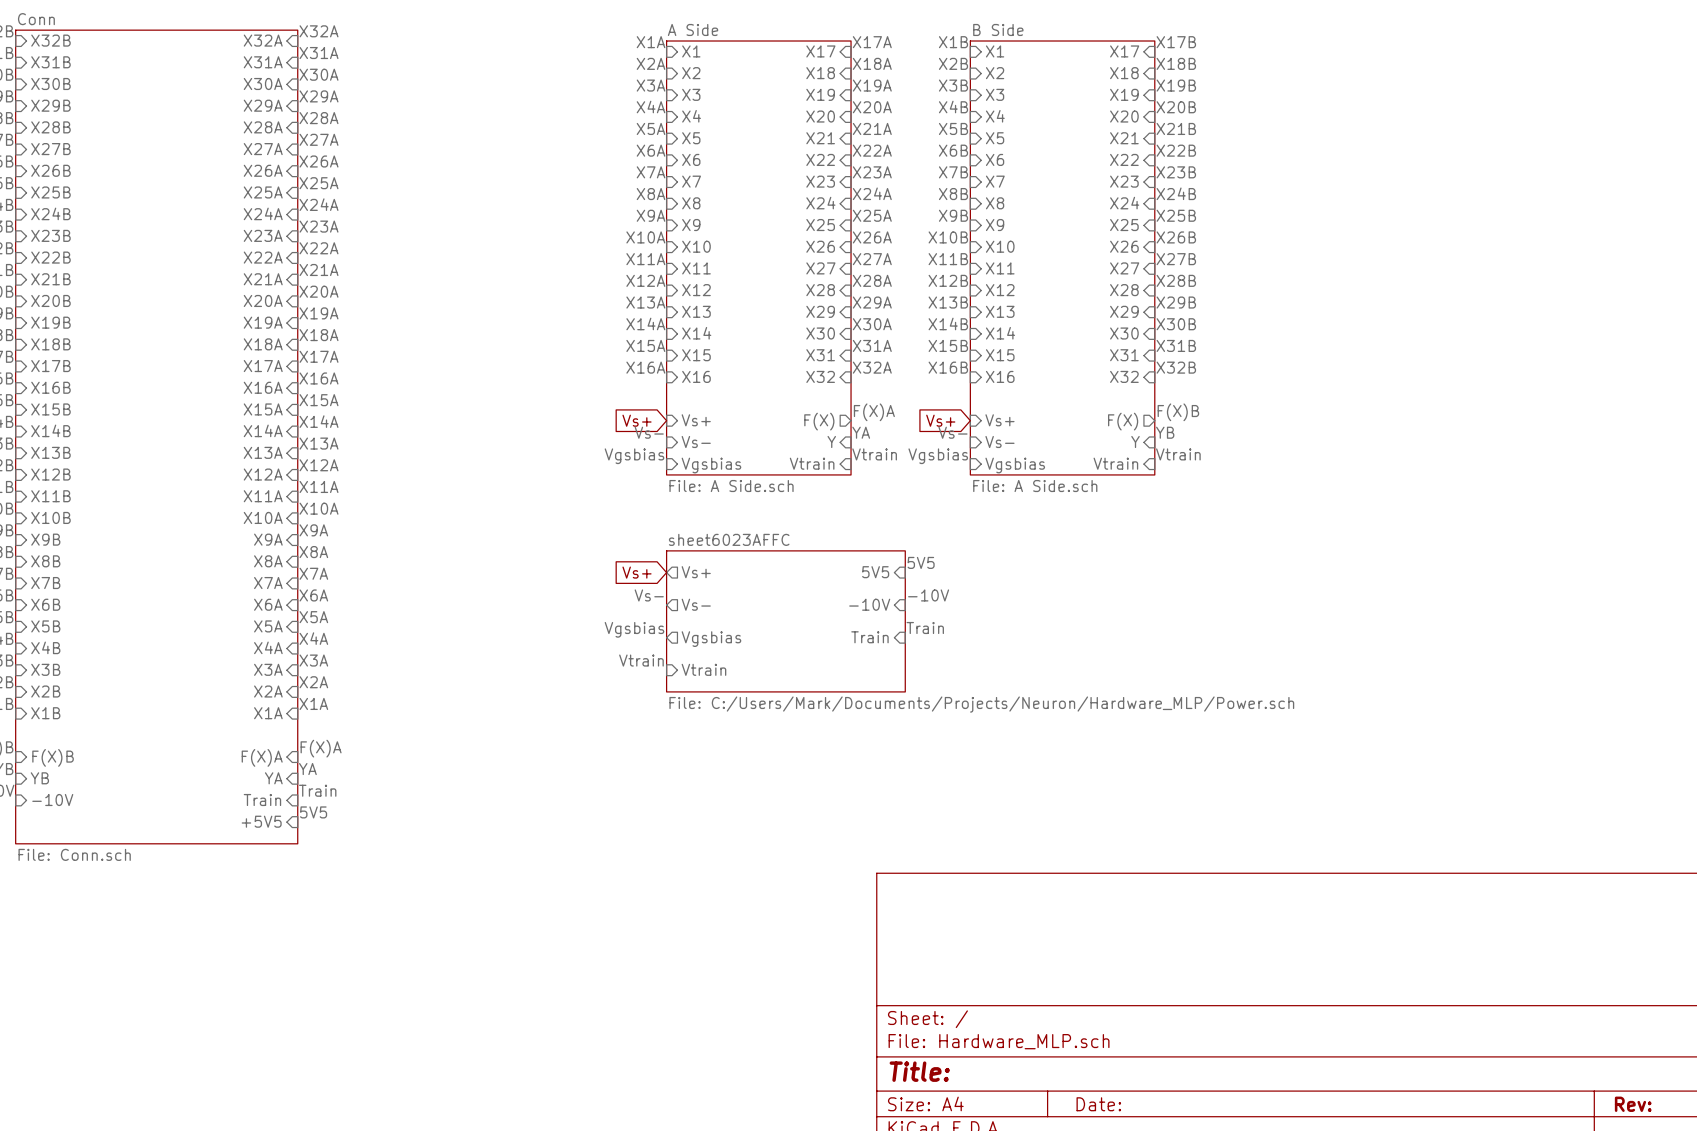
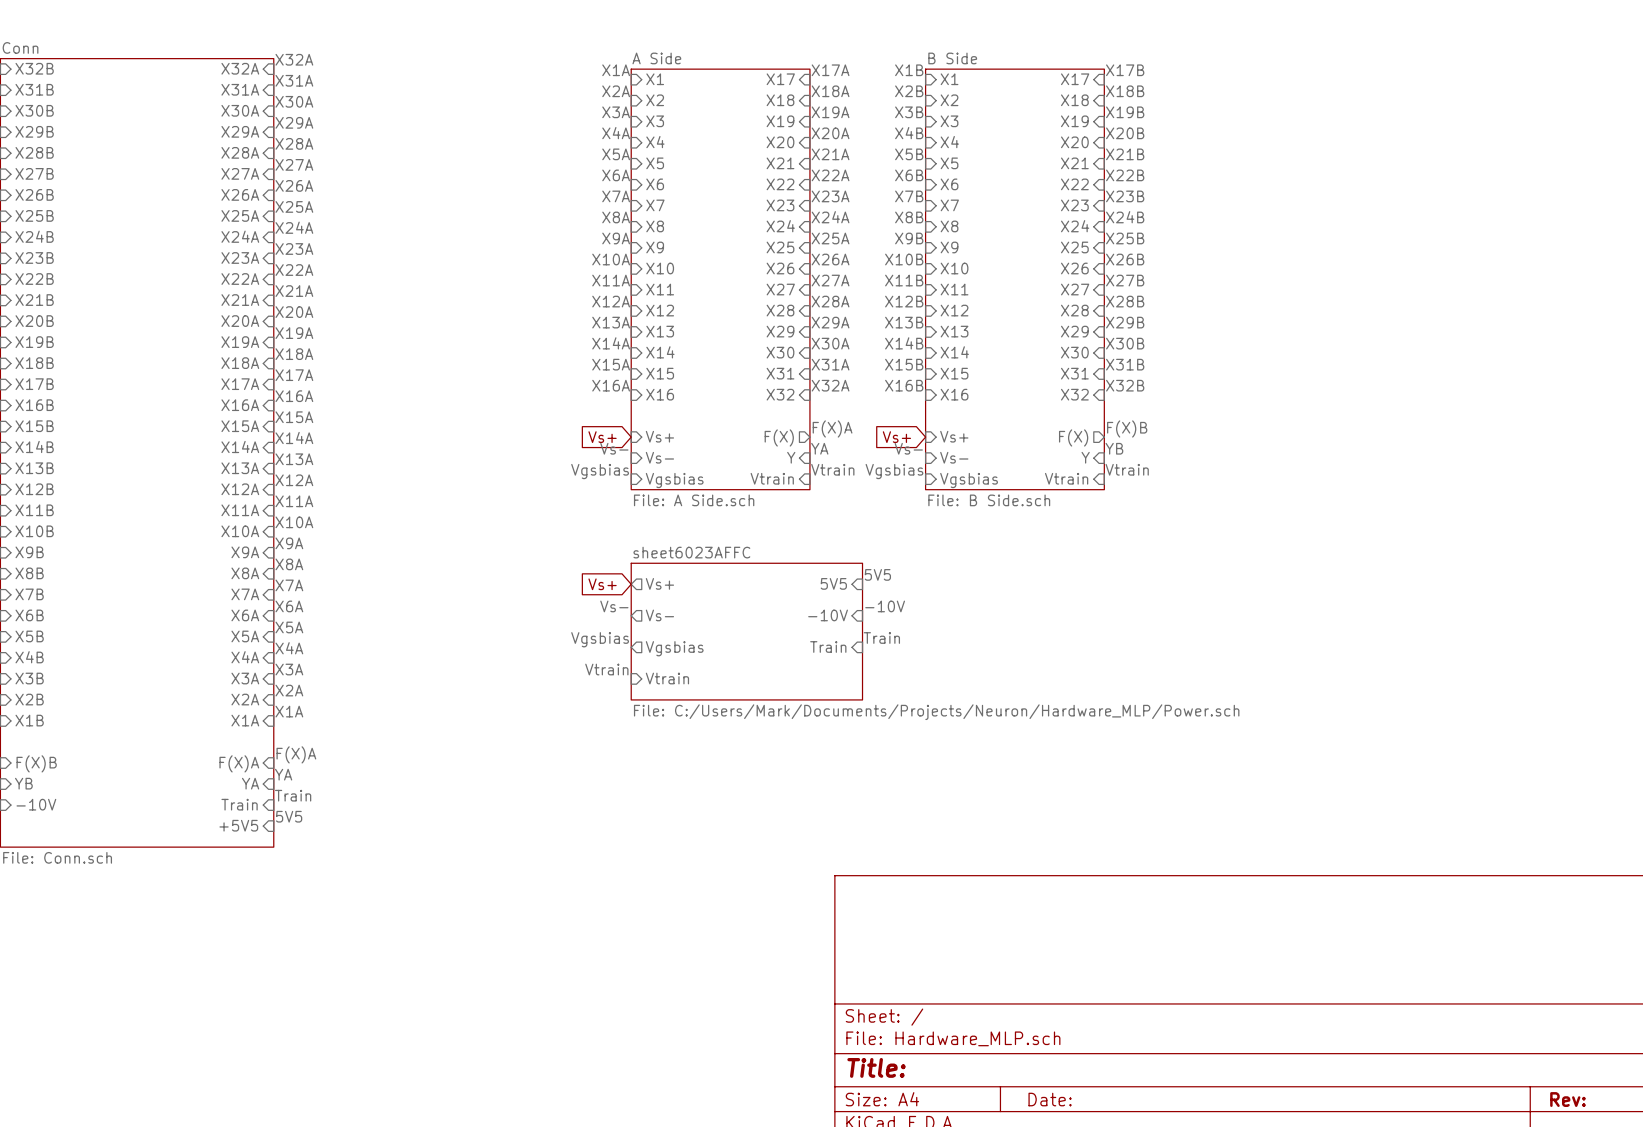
sheet B Side value: File: A Side.sch (1035, 486) -> File: B Side.sch (989, 500)

